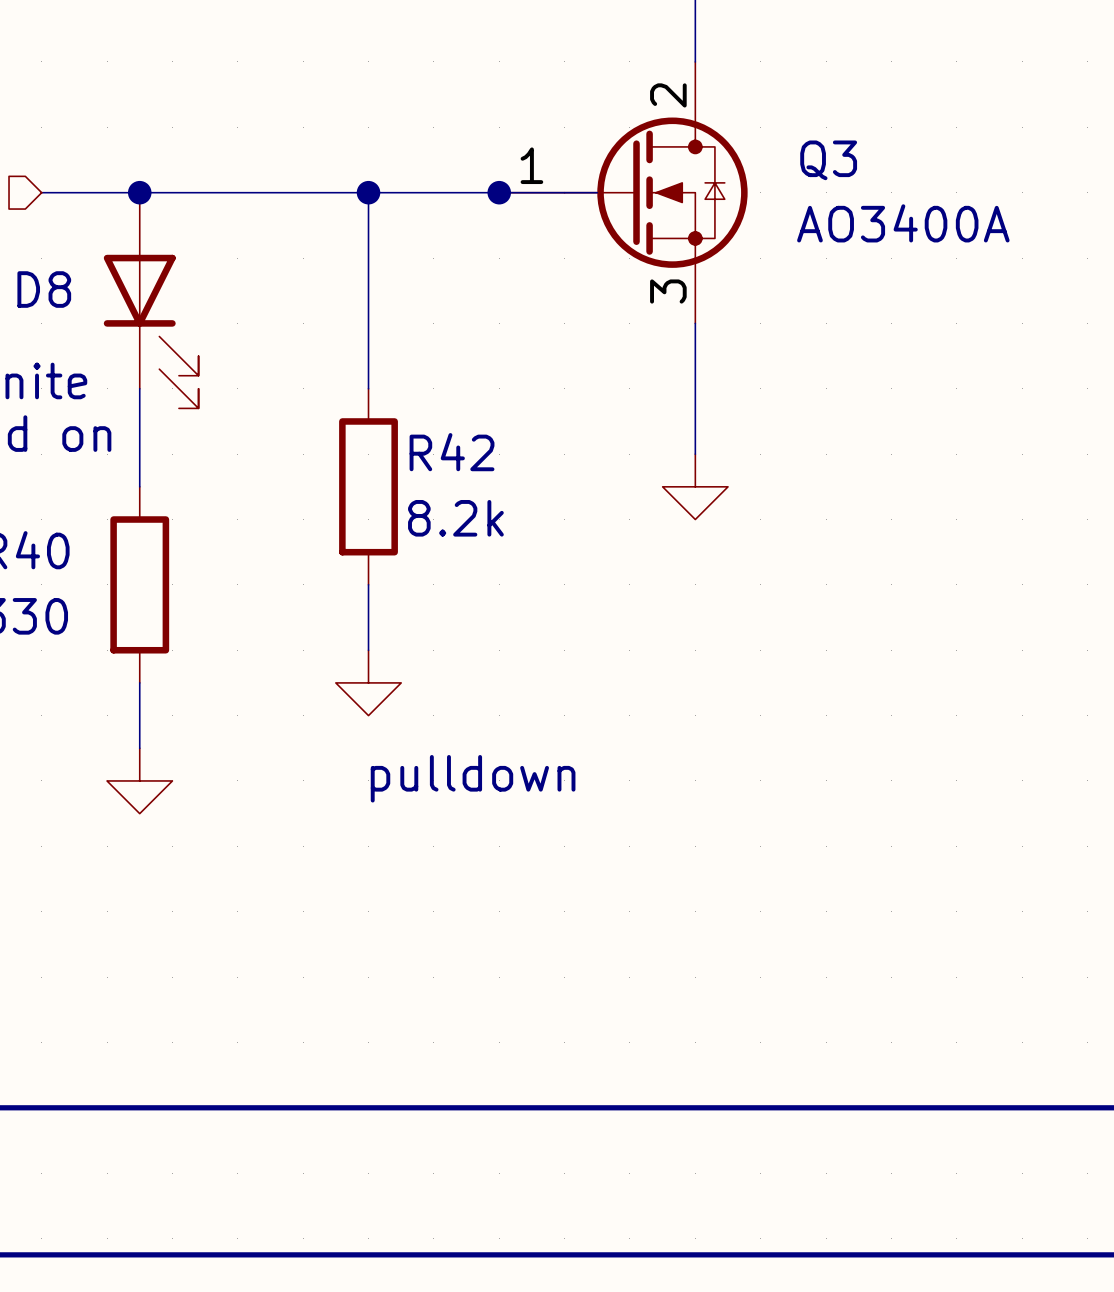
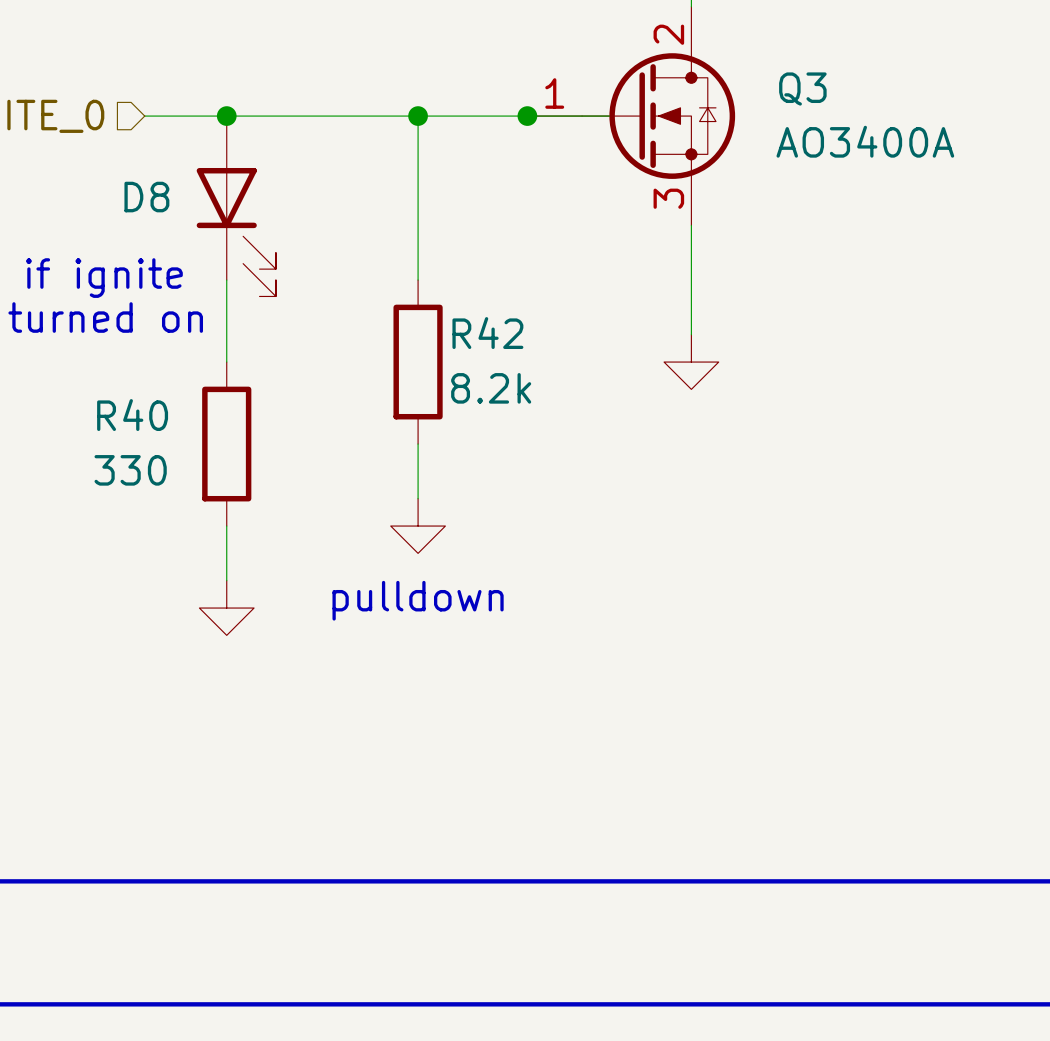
text position: pulldown (473, 778) -> pulldown (418, 600)

